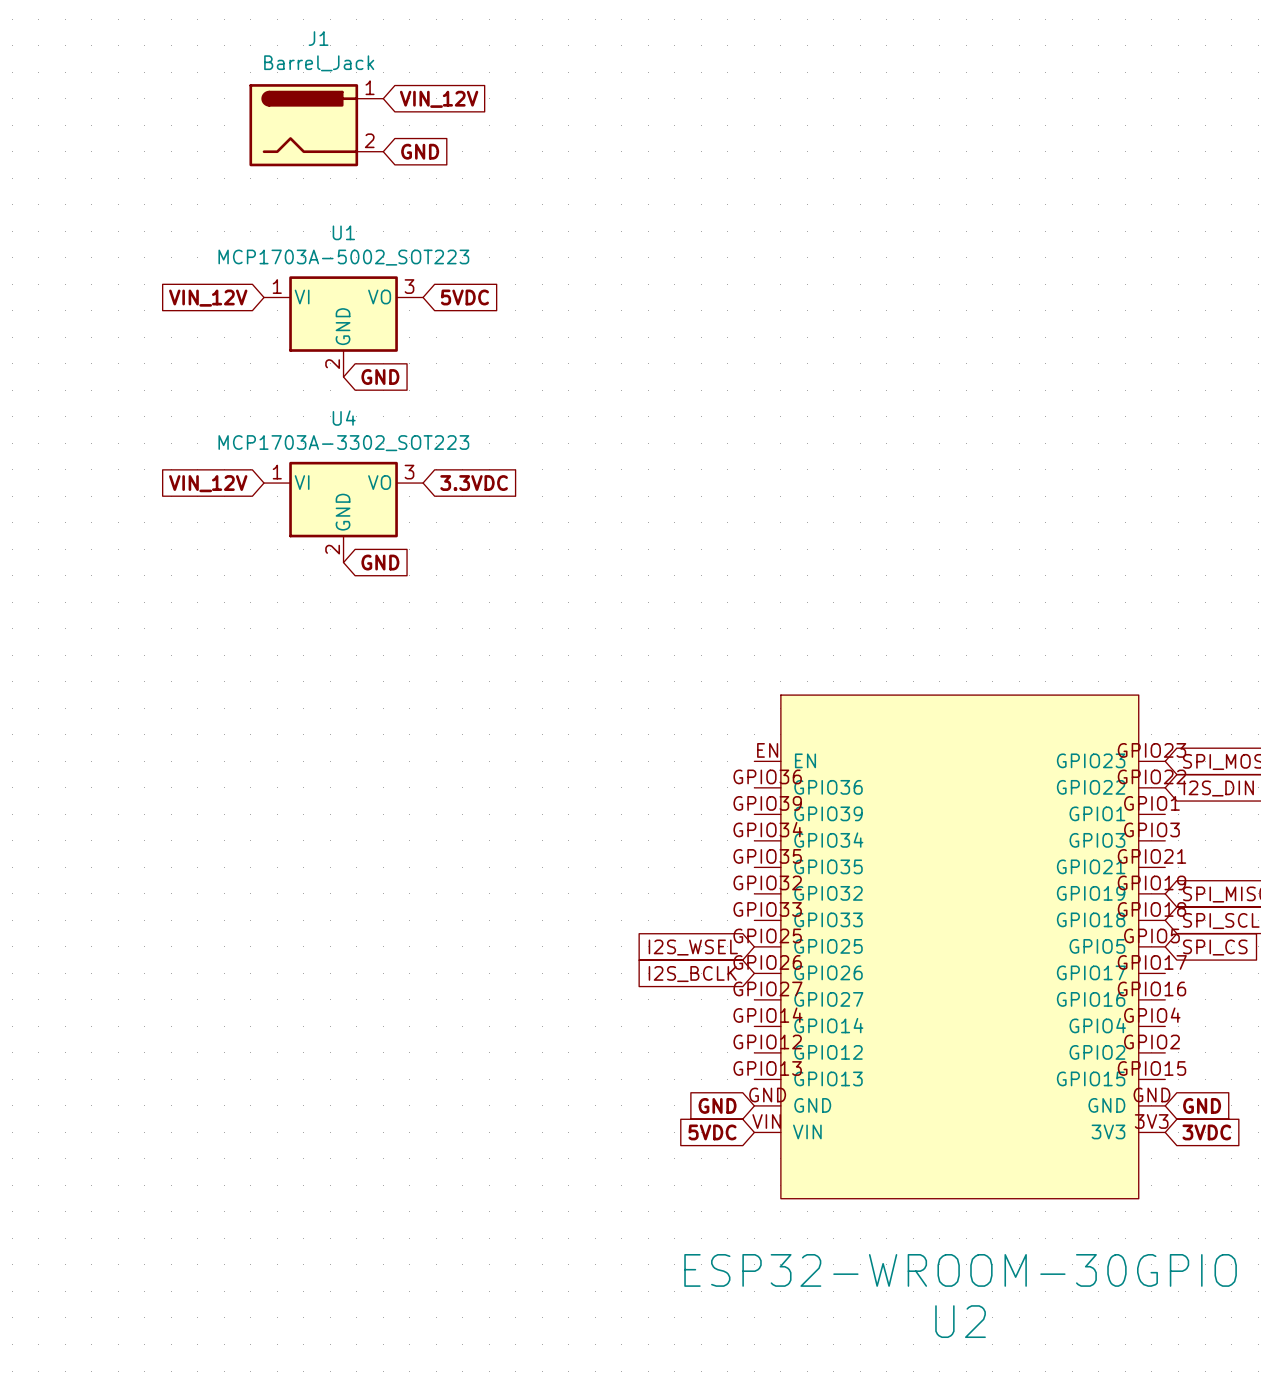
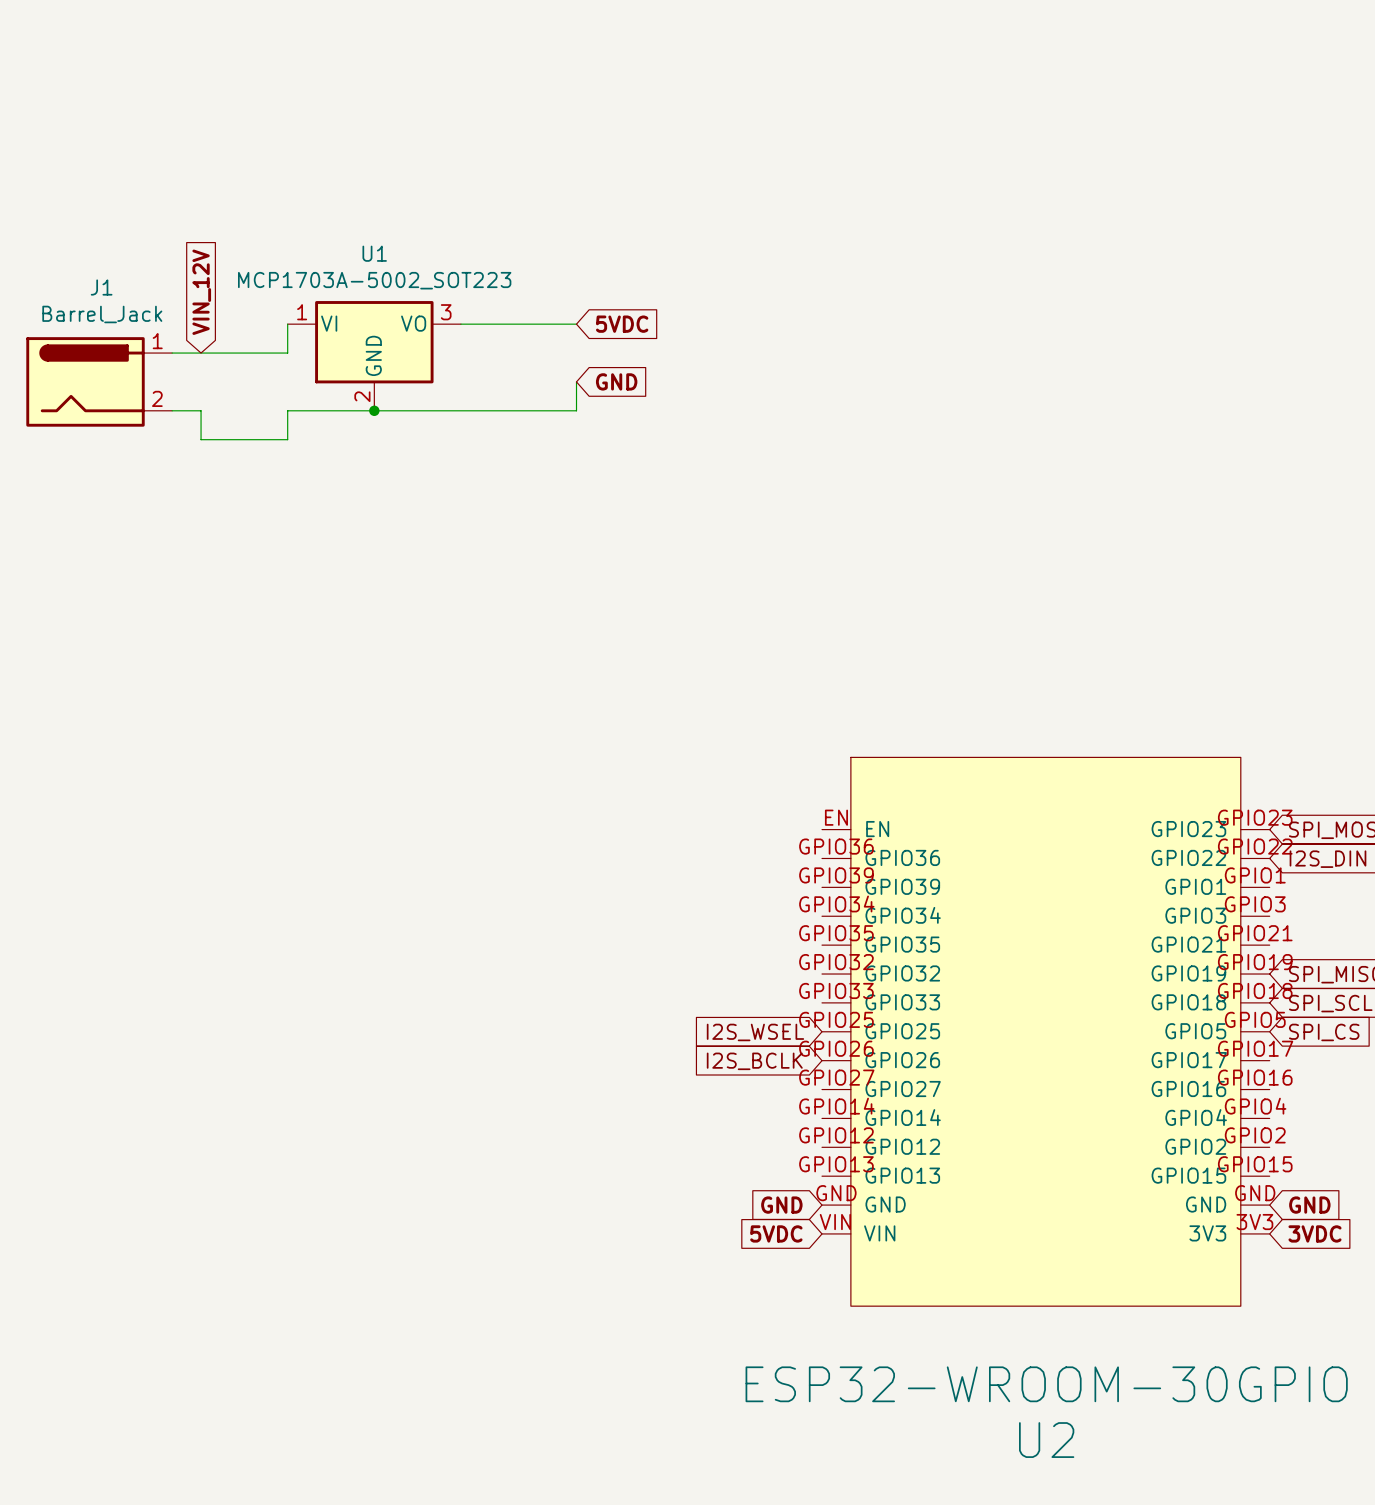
global label: VIN_12V (439, 99) -> none
J1 position: (316, 125) -> (99, 381)
global label: GND (420, 151) -> none
wire: none -> (287, 324) (287, 353) (172, 353)
wire: none -> (460, 324) (576, 324)
global label position: 5VDC (464, 297) -> 5VDC (622, 324)
global label rotation: 0° (208, 298) -> 90° clockwise (201, 292)
wire: none -> (576, 381) (576, 410) (287, 410) (287, 439) (201, 439) (201, 410) (172, 410)
global label: none -> GND (616, 381)
junction: none -> (374, 410)
global label: GND (380, 377) -> none
global label: VIN_12V (208, 483) -> none
global label: 3.3VDC (474, 483) -> none
U4: MCP1703A-3302_SOT223 (343, 512) -> none
global label: GND (380, 562) -> none

